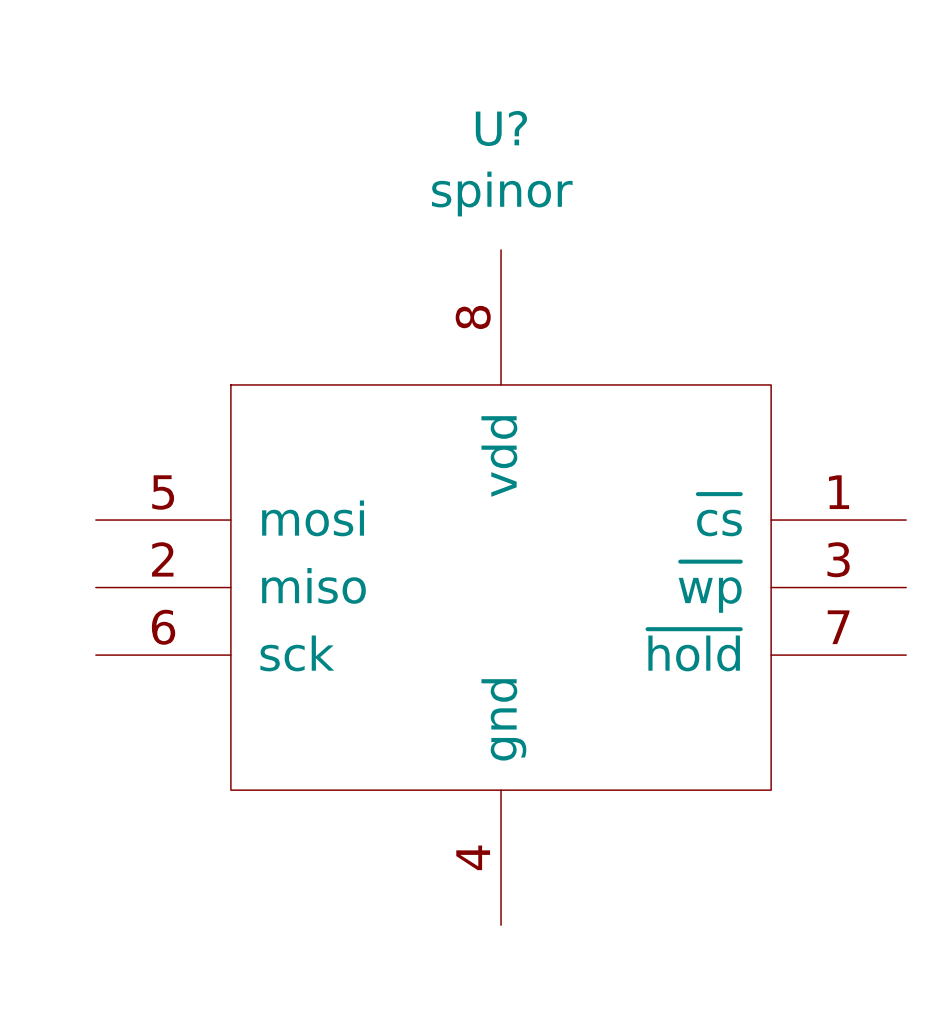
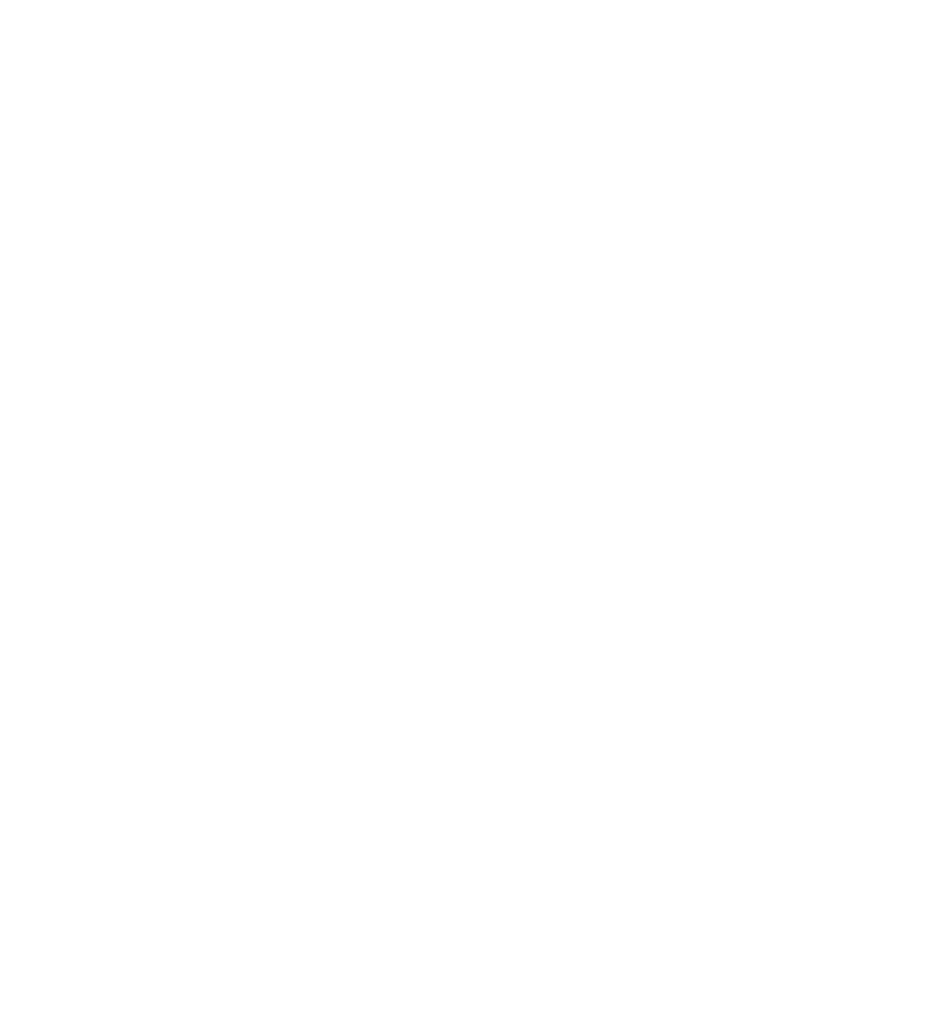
U?: spinor (501, 587) -> none

